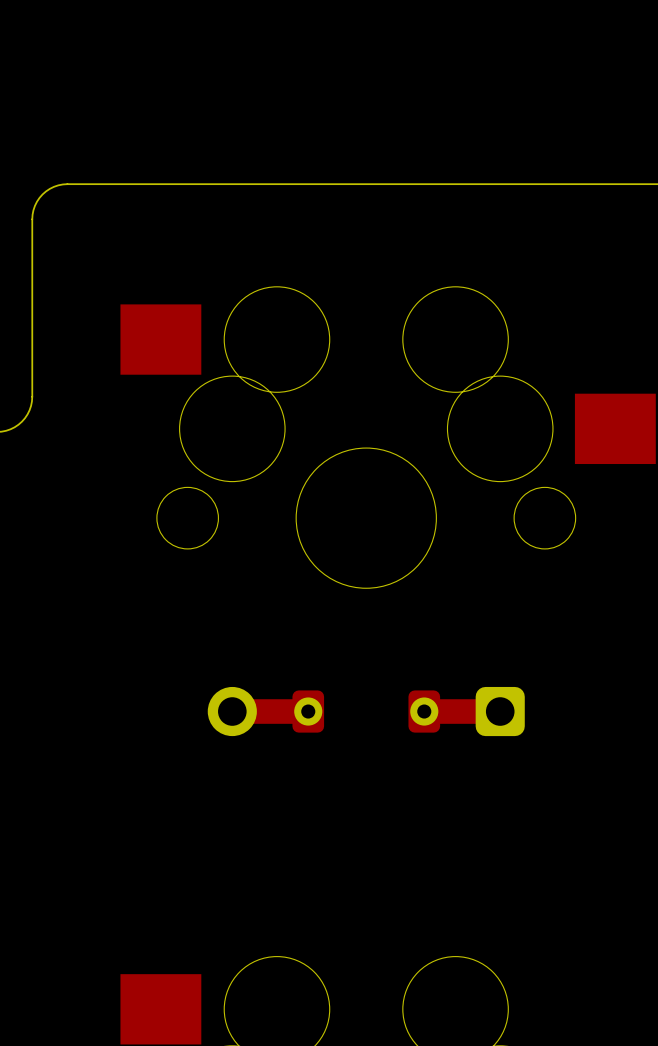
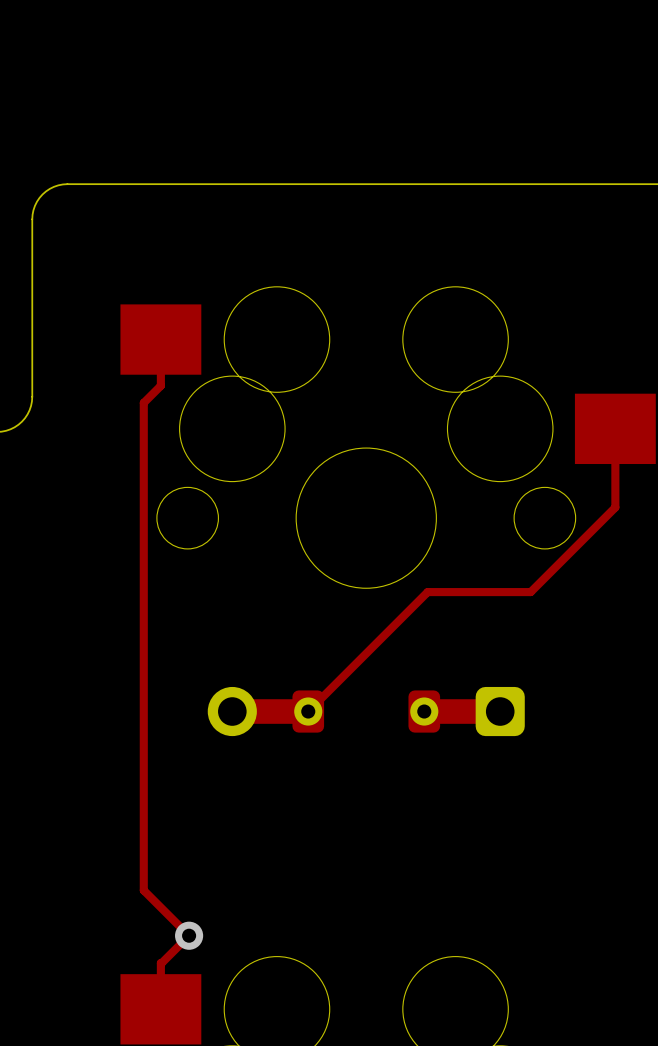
track: none -> (160, 339) (160, 385) (143, 402) (143, 890) (189, 935) (160, 963) (160, 1009)
track: none -> (615, 428) (615, 507) (530, 592) (427, 592) (308, 711) (232, 711)
via: none -> (189, 935)

